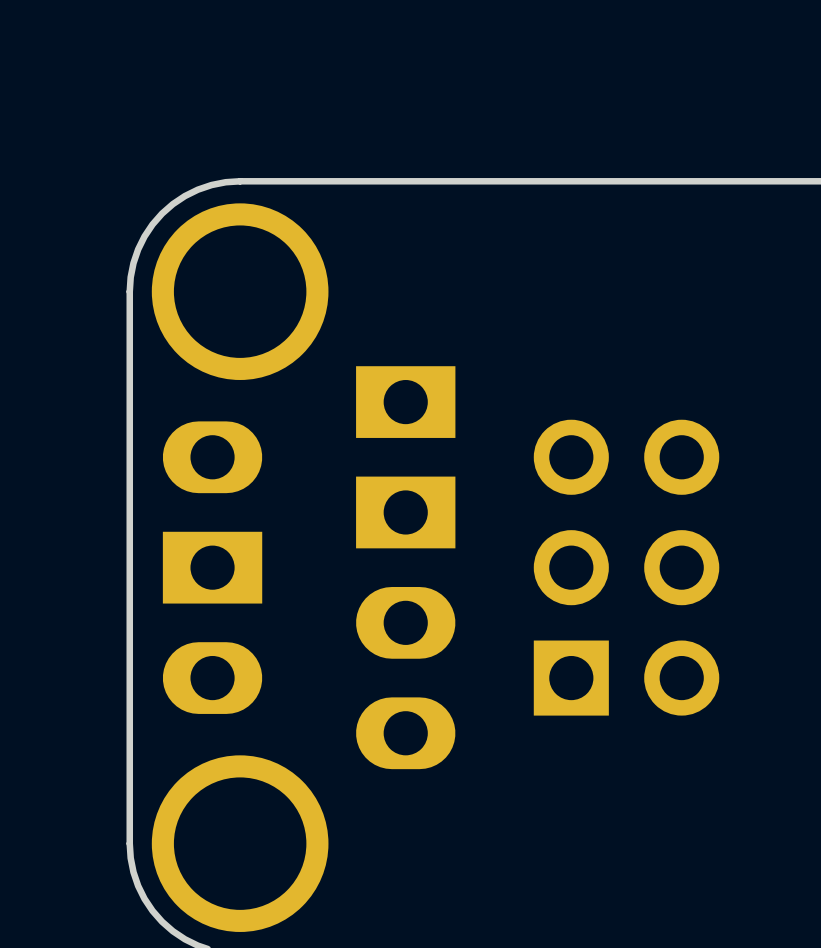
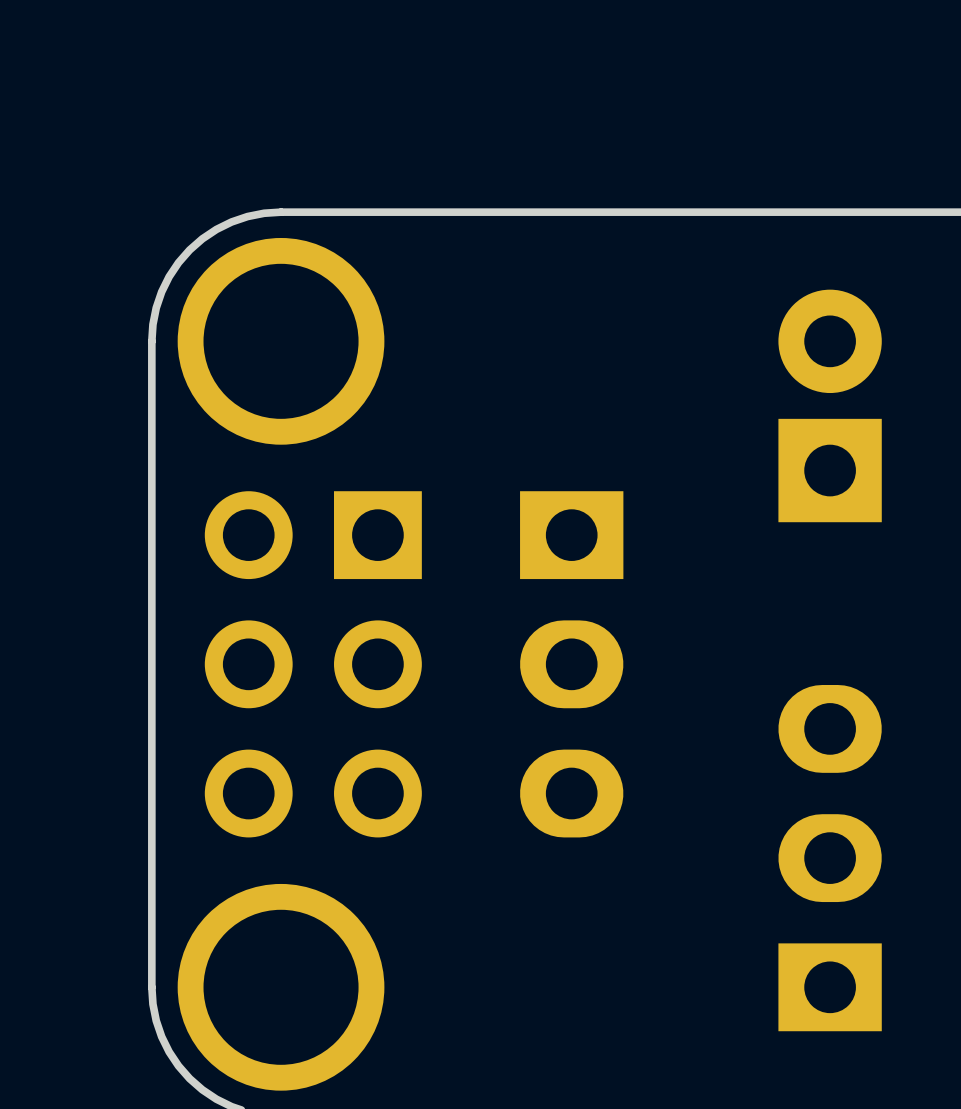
part: none -> (830, 405)
part: (212, 567) -> none
part: (405, 567) -> none
part: none -> (571, 664)
part rotation: 0° (626, 567) -> 180° (313, 664)
part position: (626, 567) -> (313, 664)
part: none -> (830, 858)

